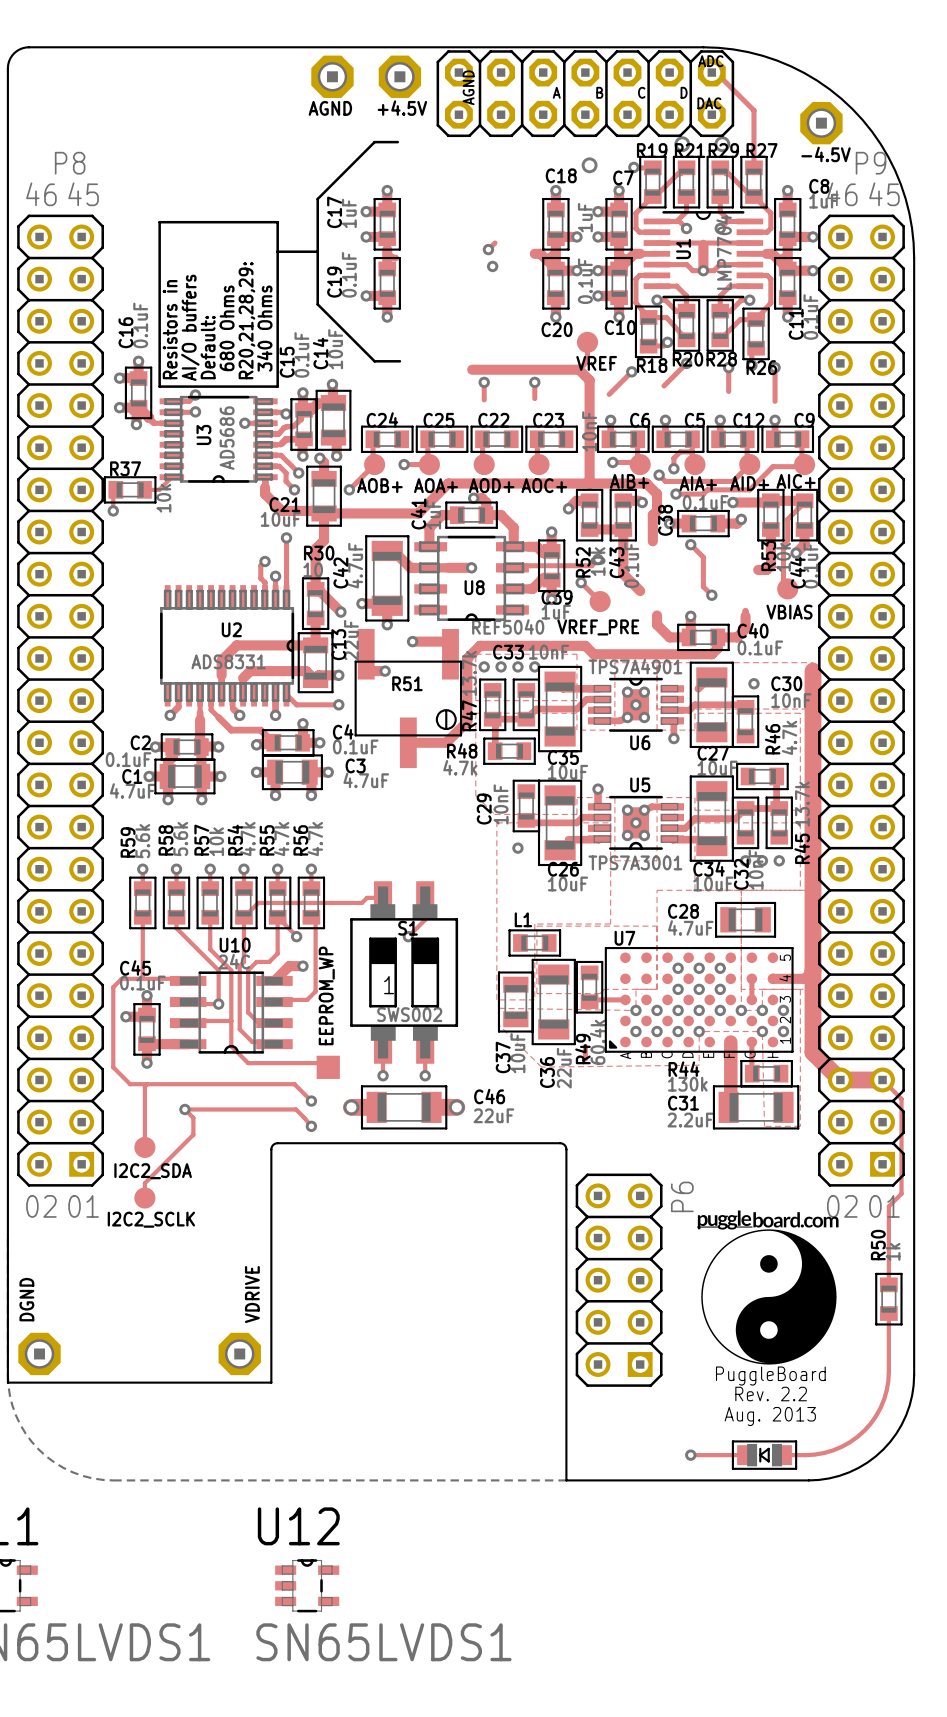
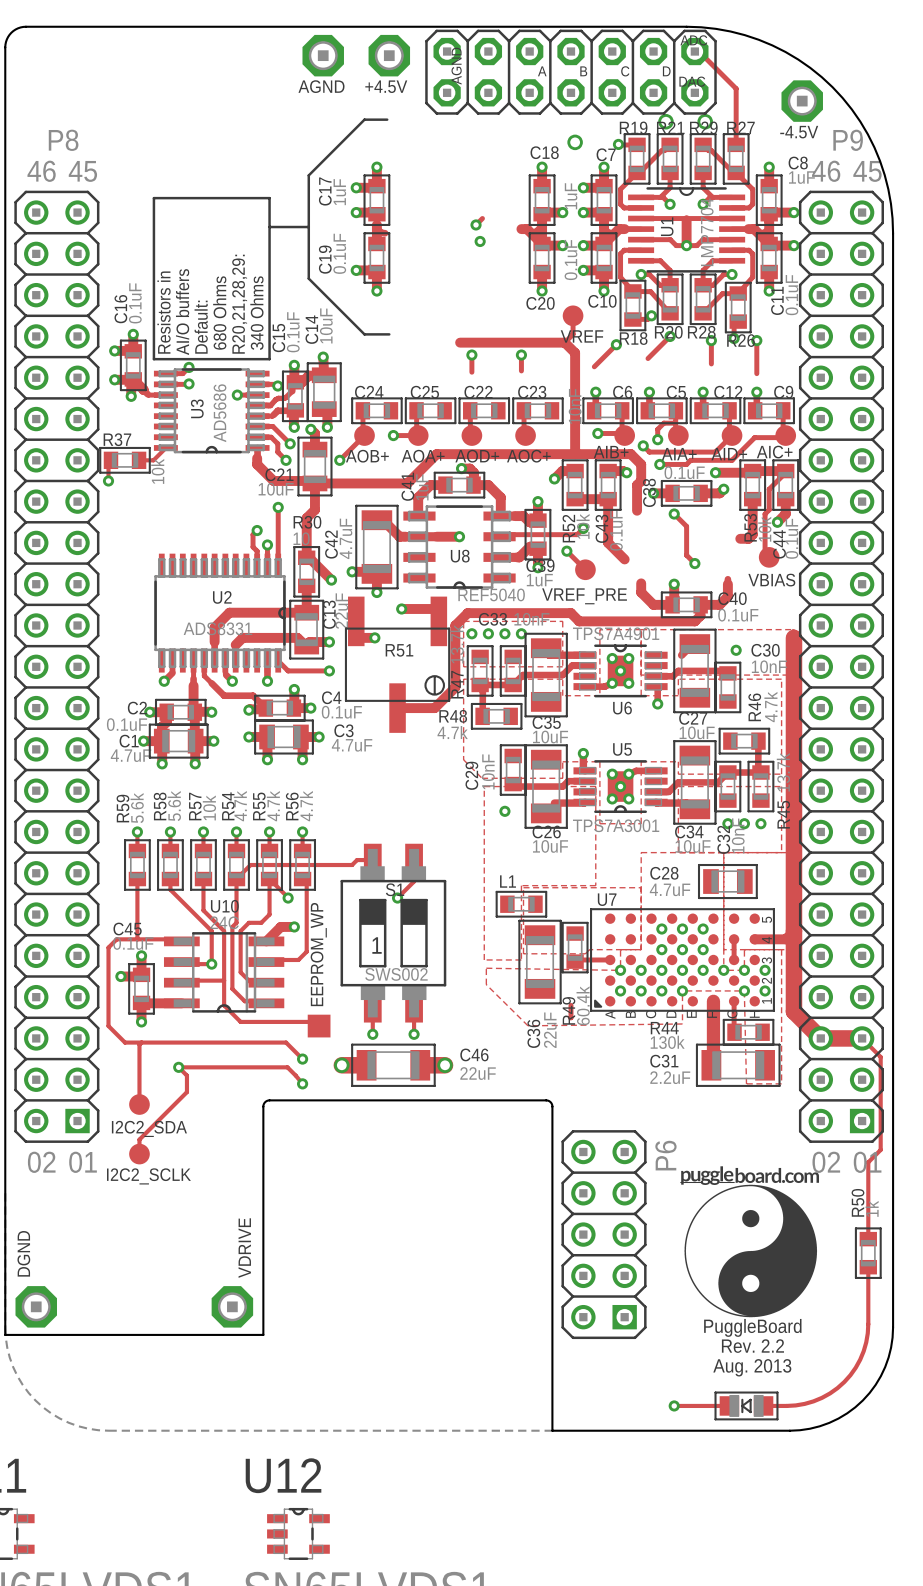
C37: 10uF (515, 1002) -> none

